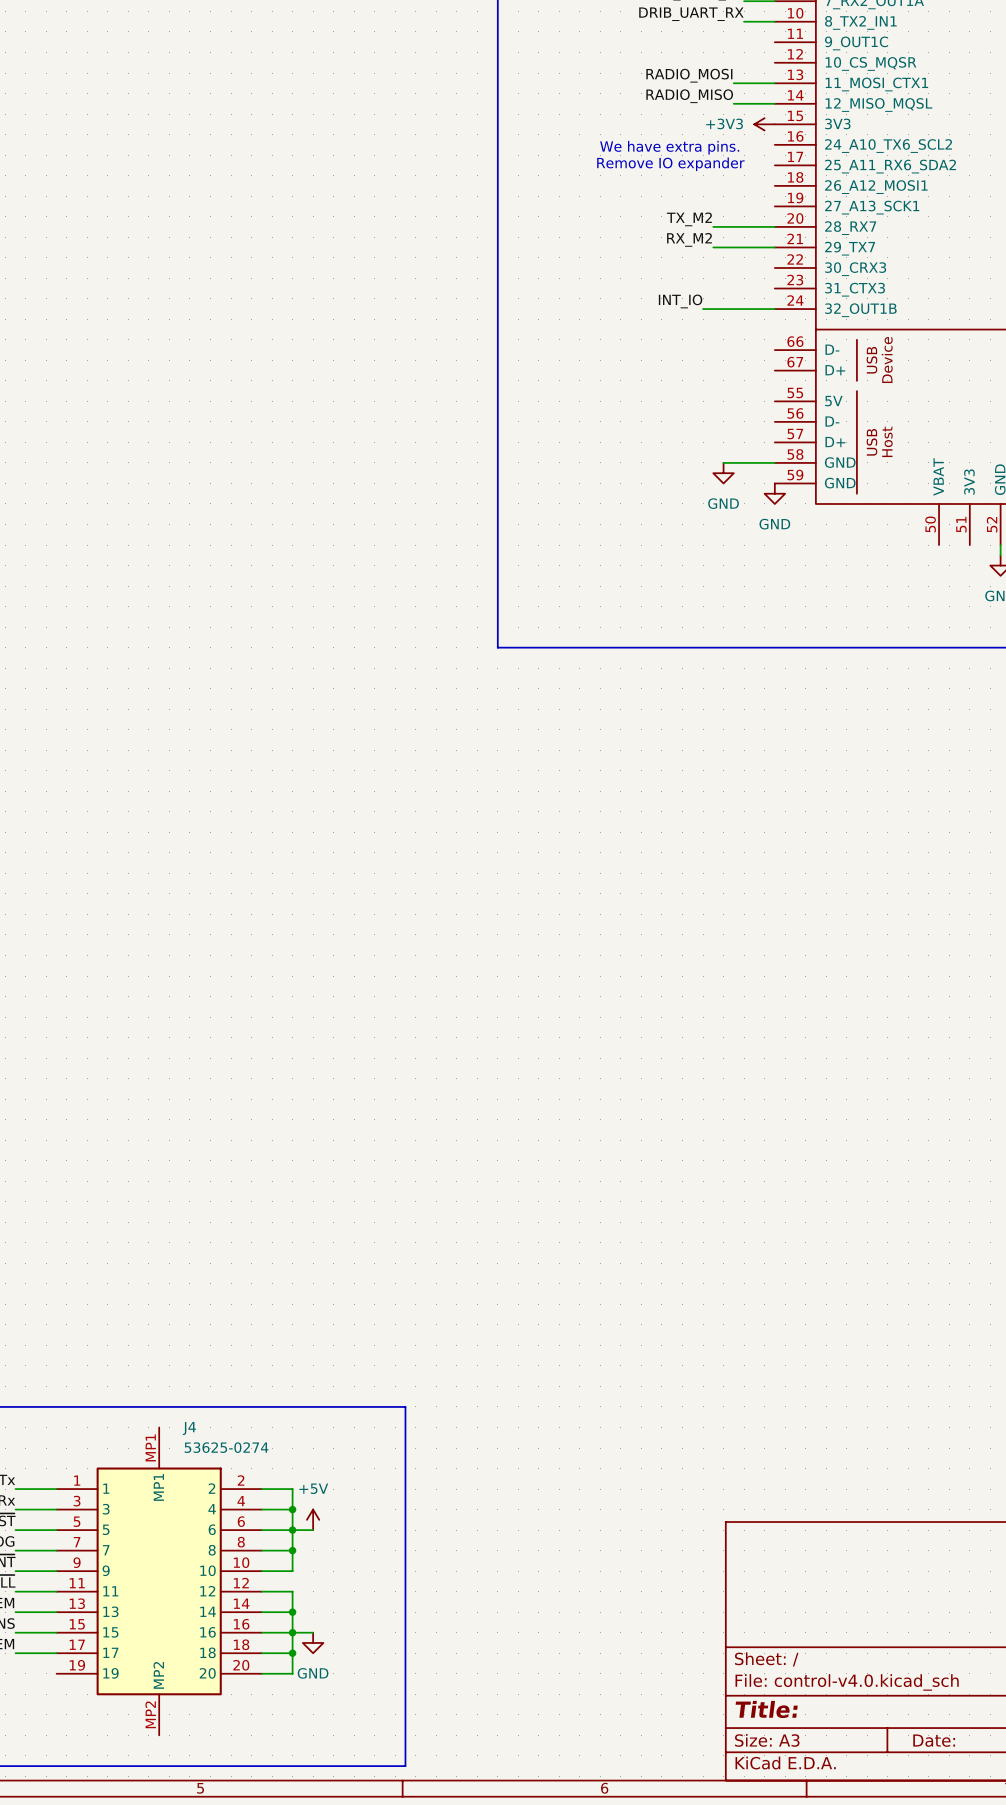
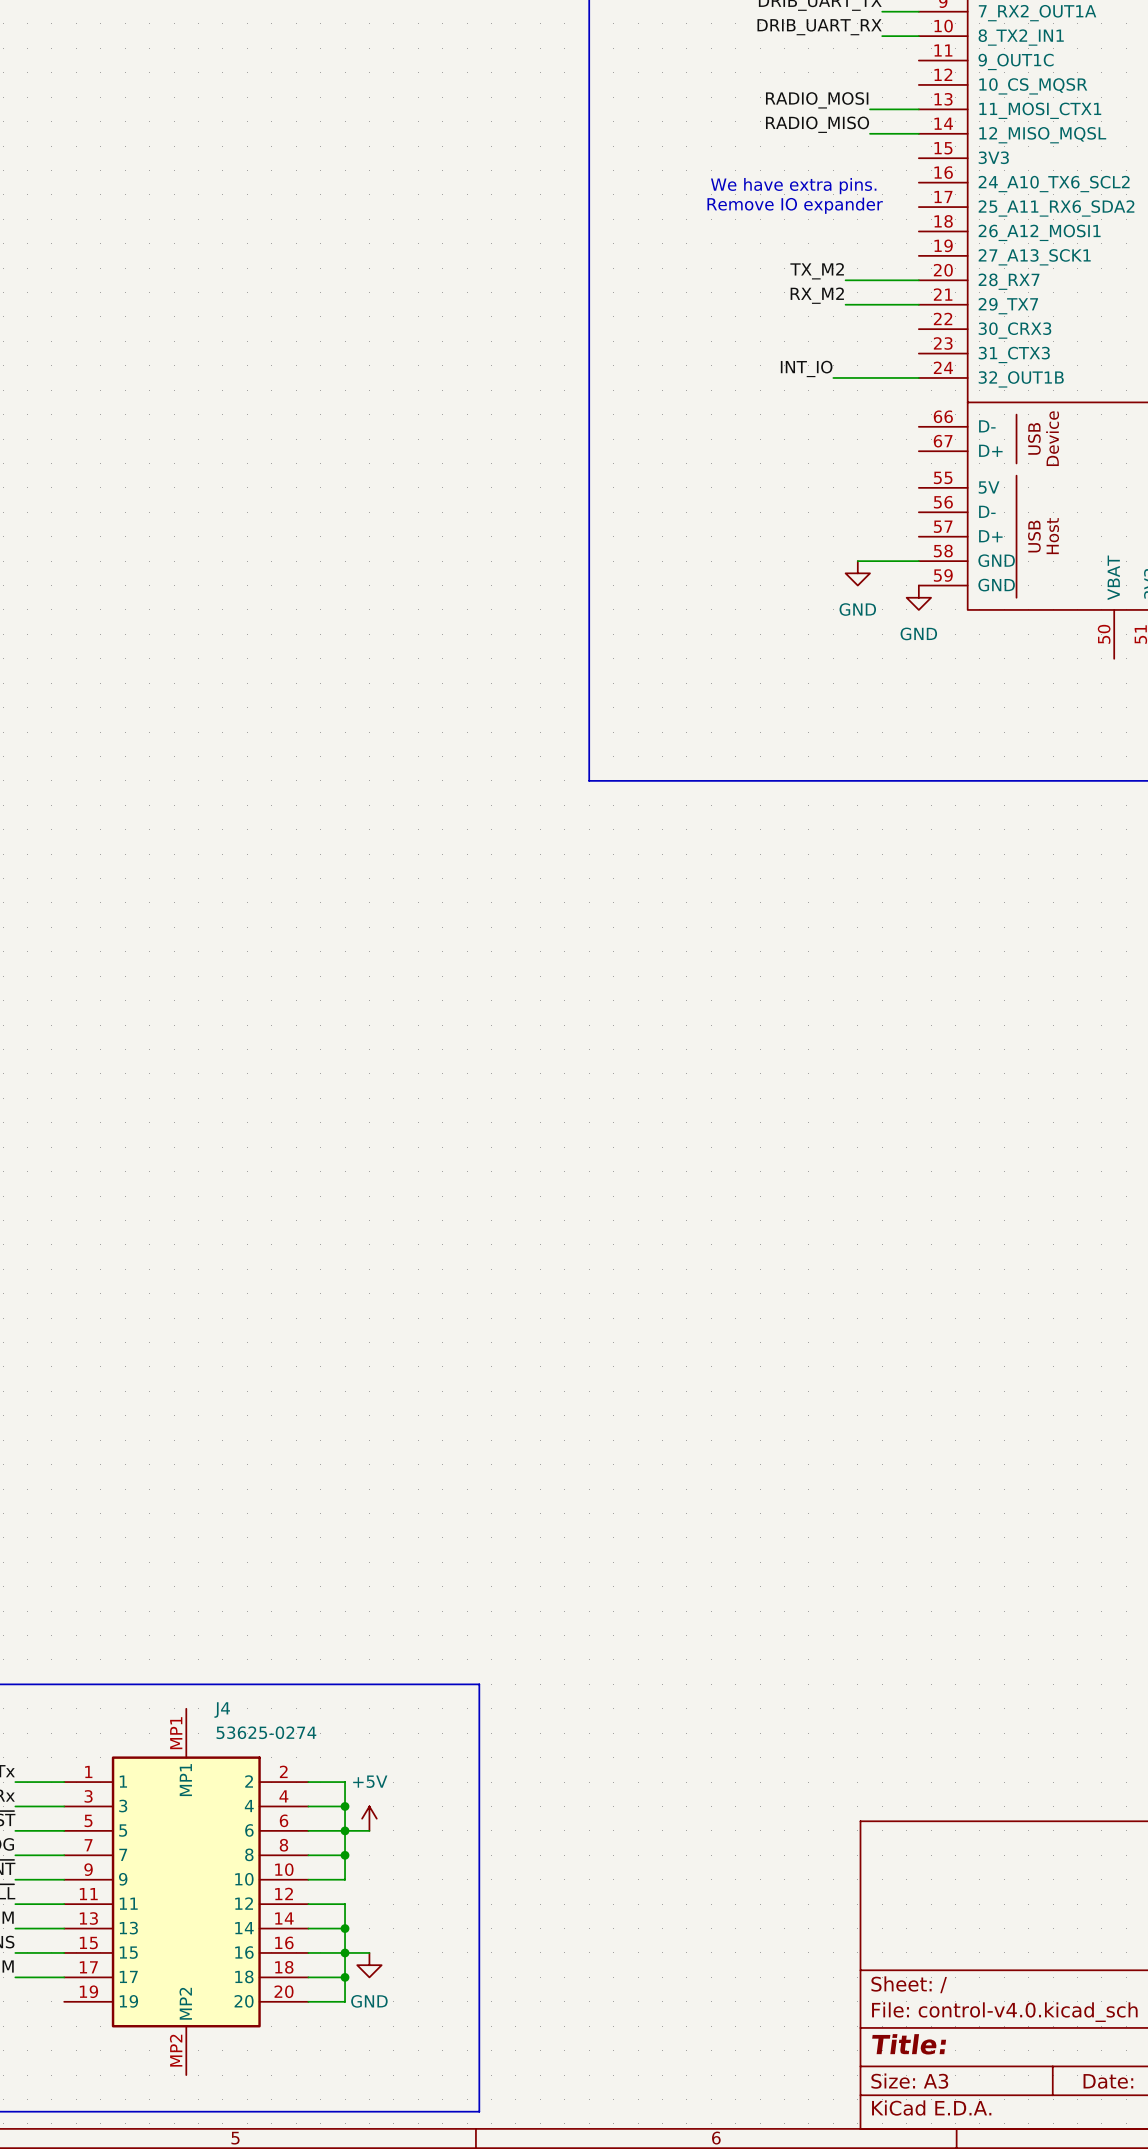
power symbol: +3V3 (764, 124) -> none

